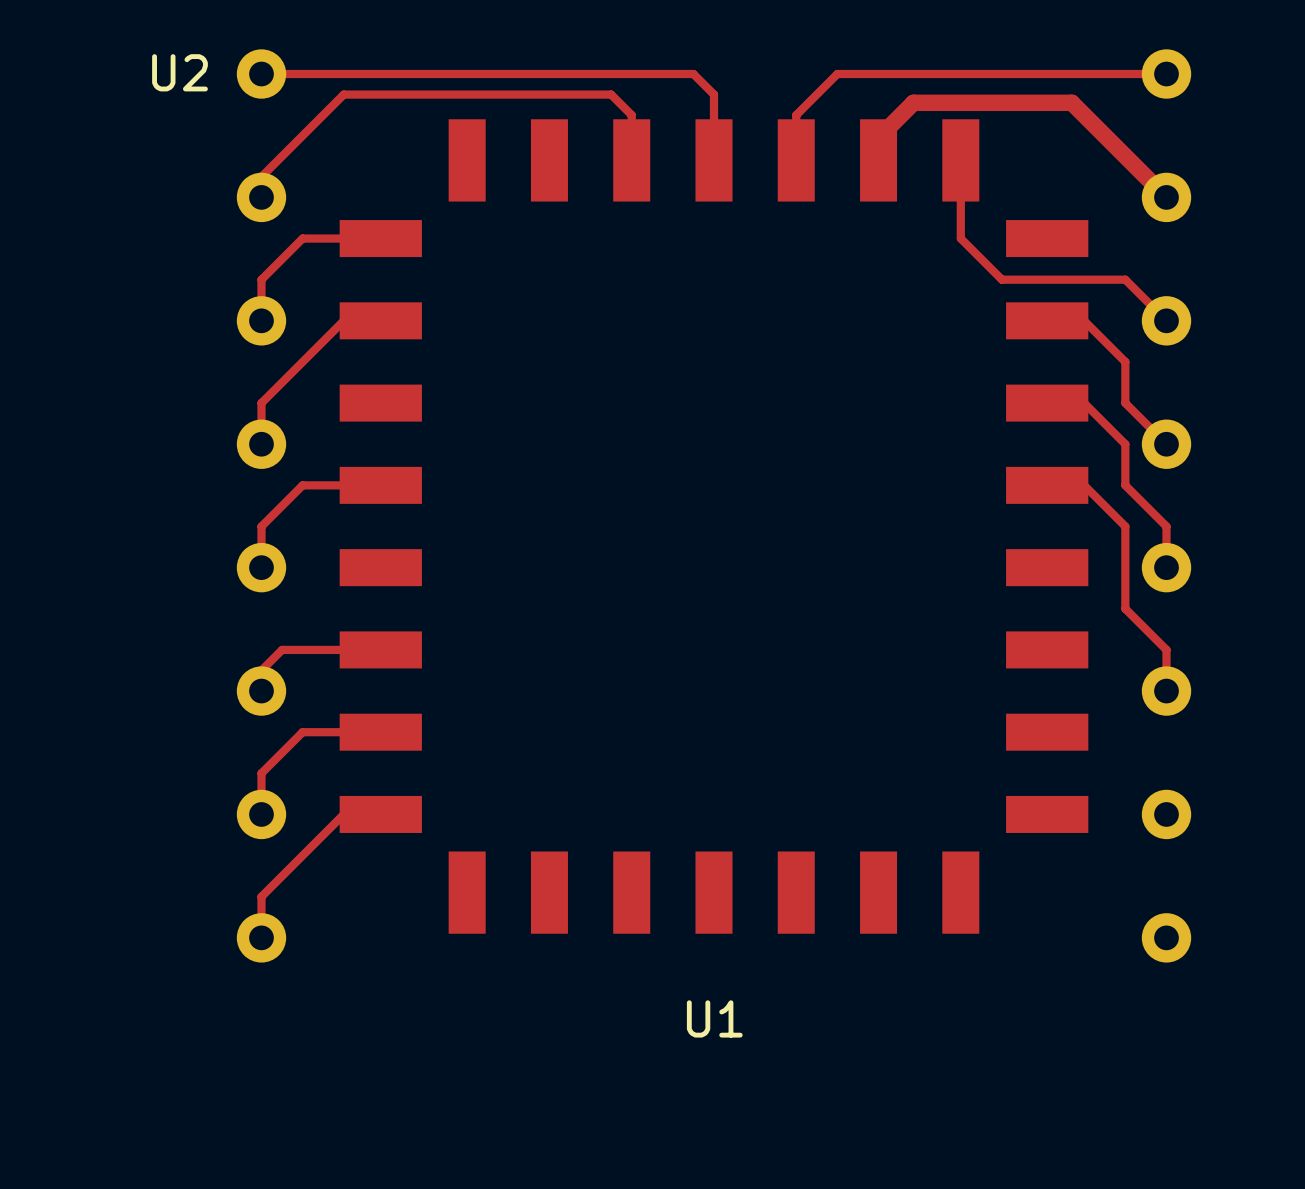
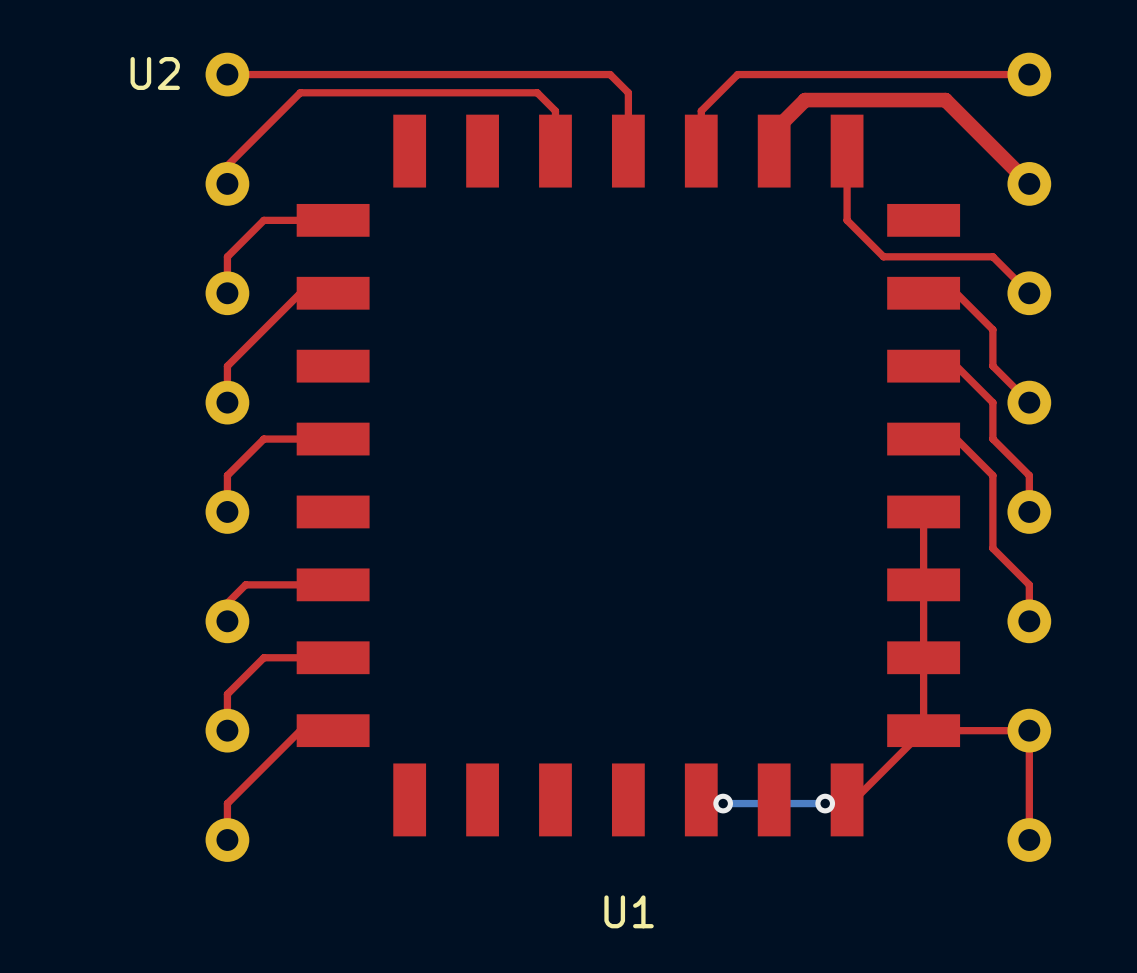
top track: none -> (923, 511) (923, 730)
top track: none -> (923, 730) (1029, 730) (1029, 840)
top track: none -> (923, 730) (854, 799) (828, 799) (825, 803)
bottom track: none -> (723, 803) (825, 803)
via: none -> (723, 803)
via: none -> (825, 803)

